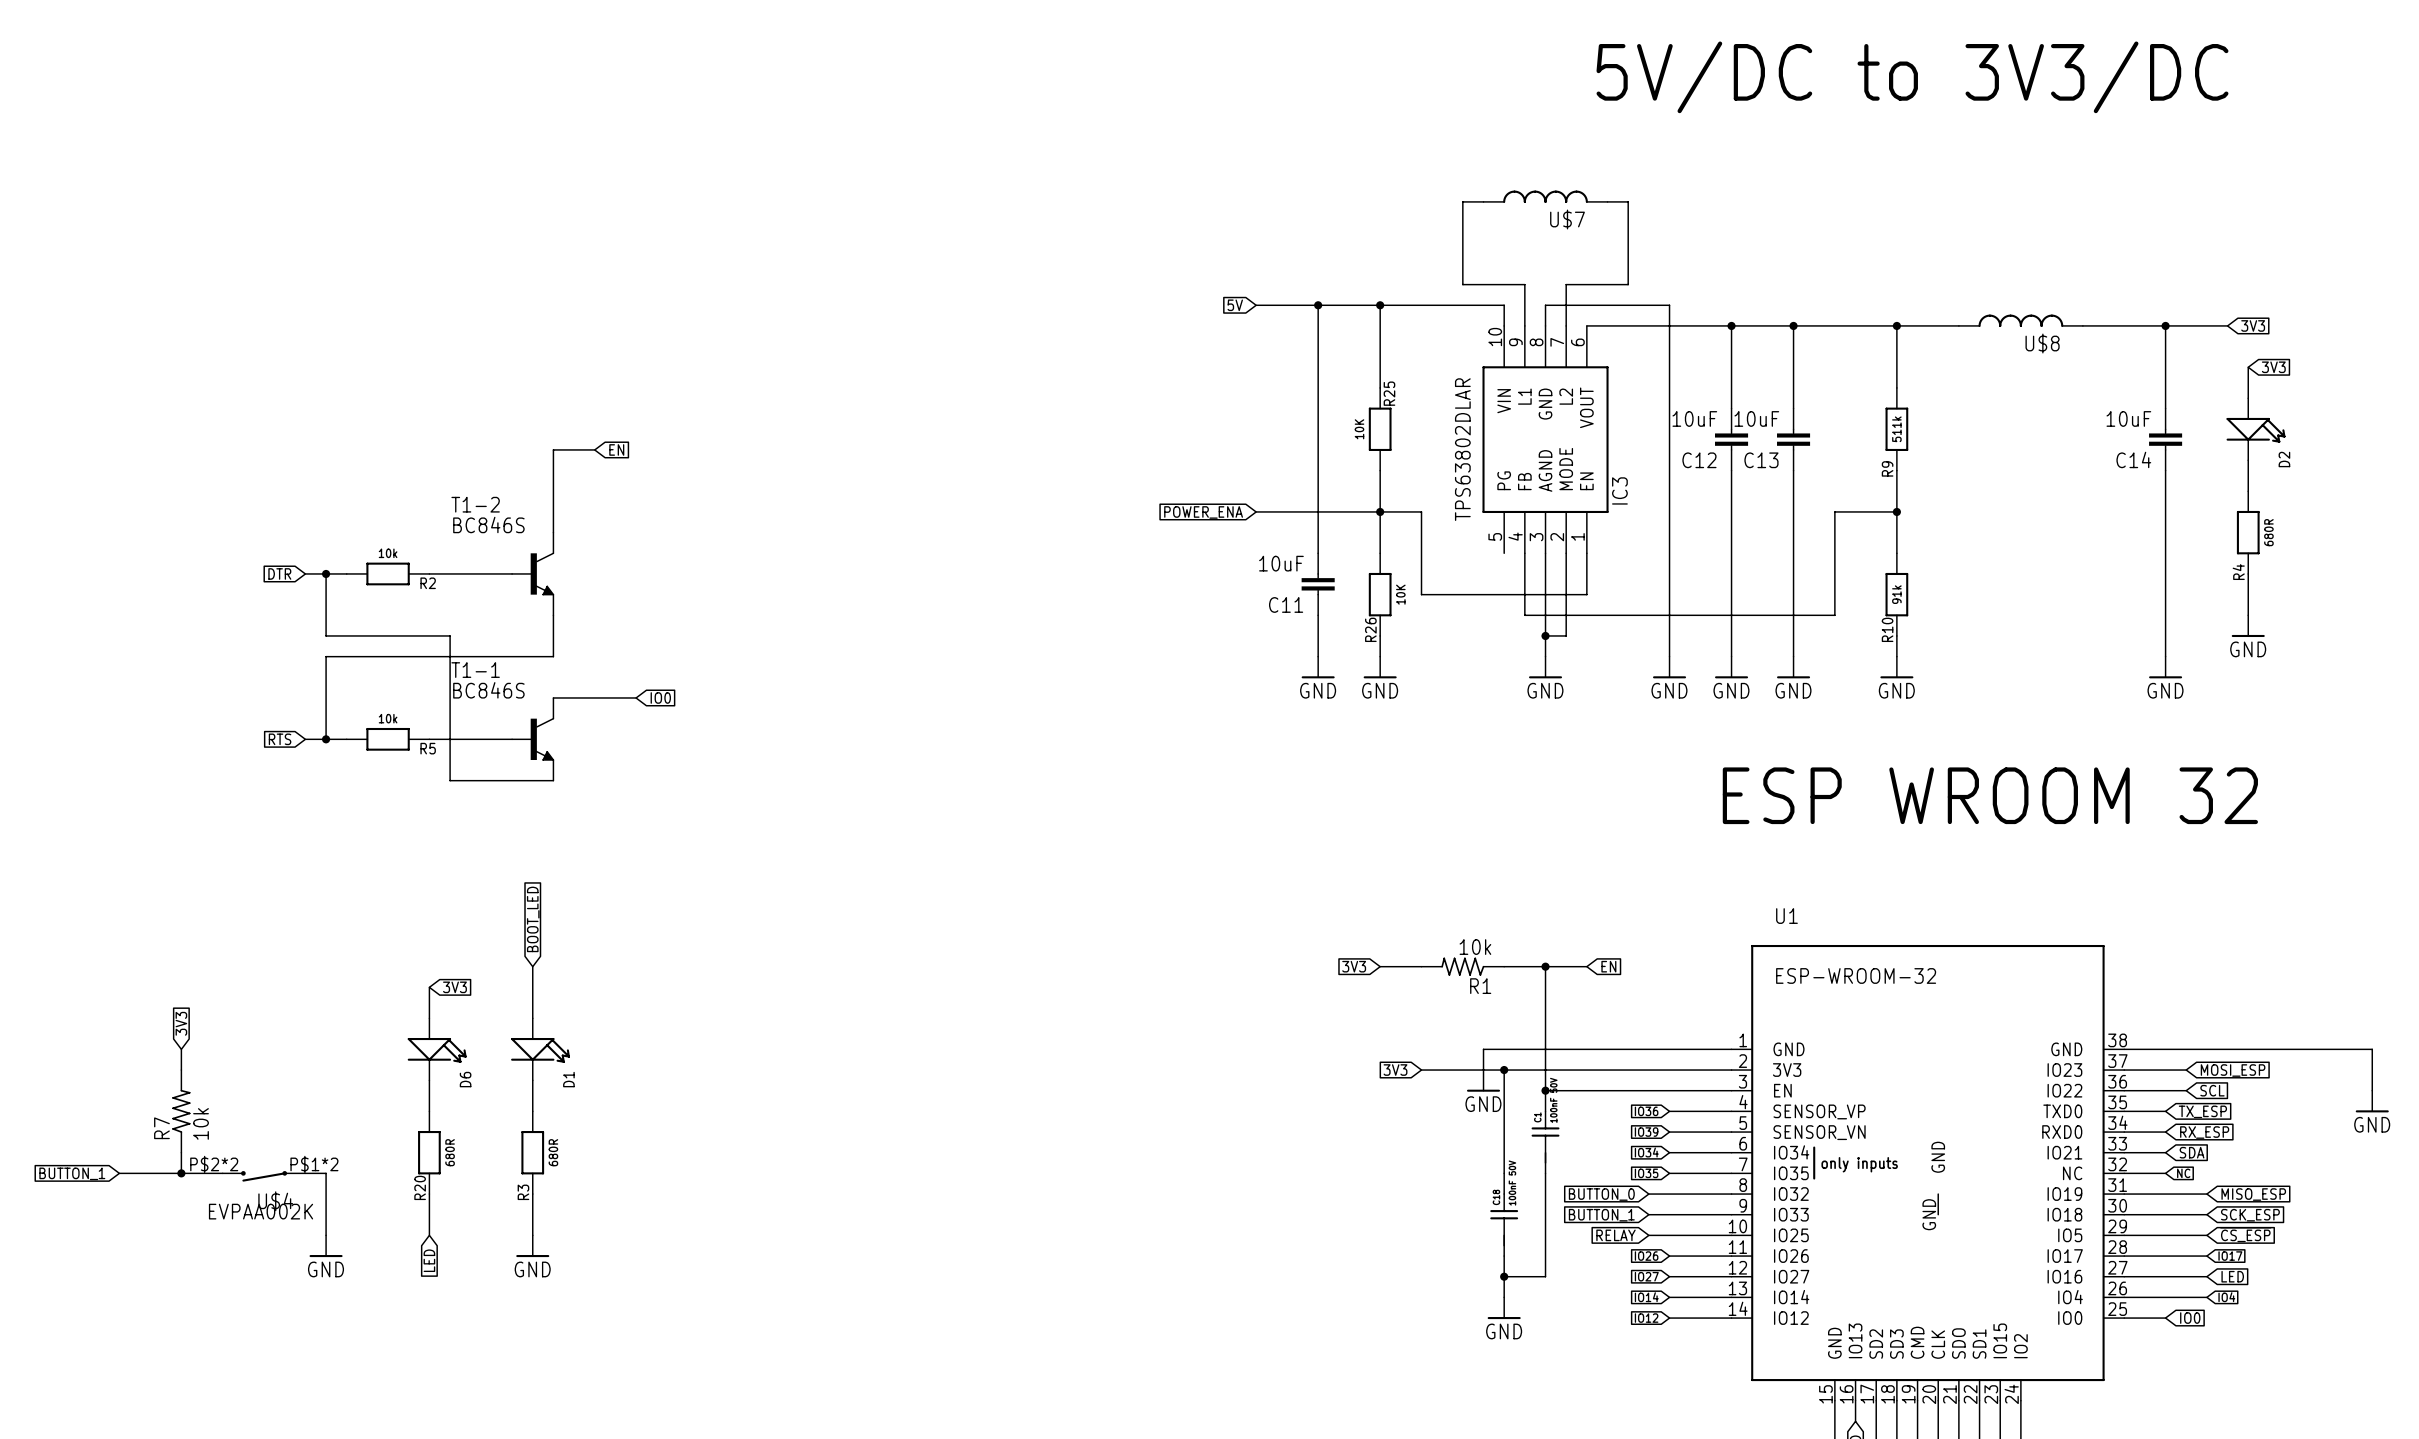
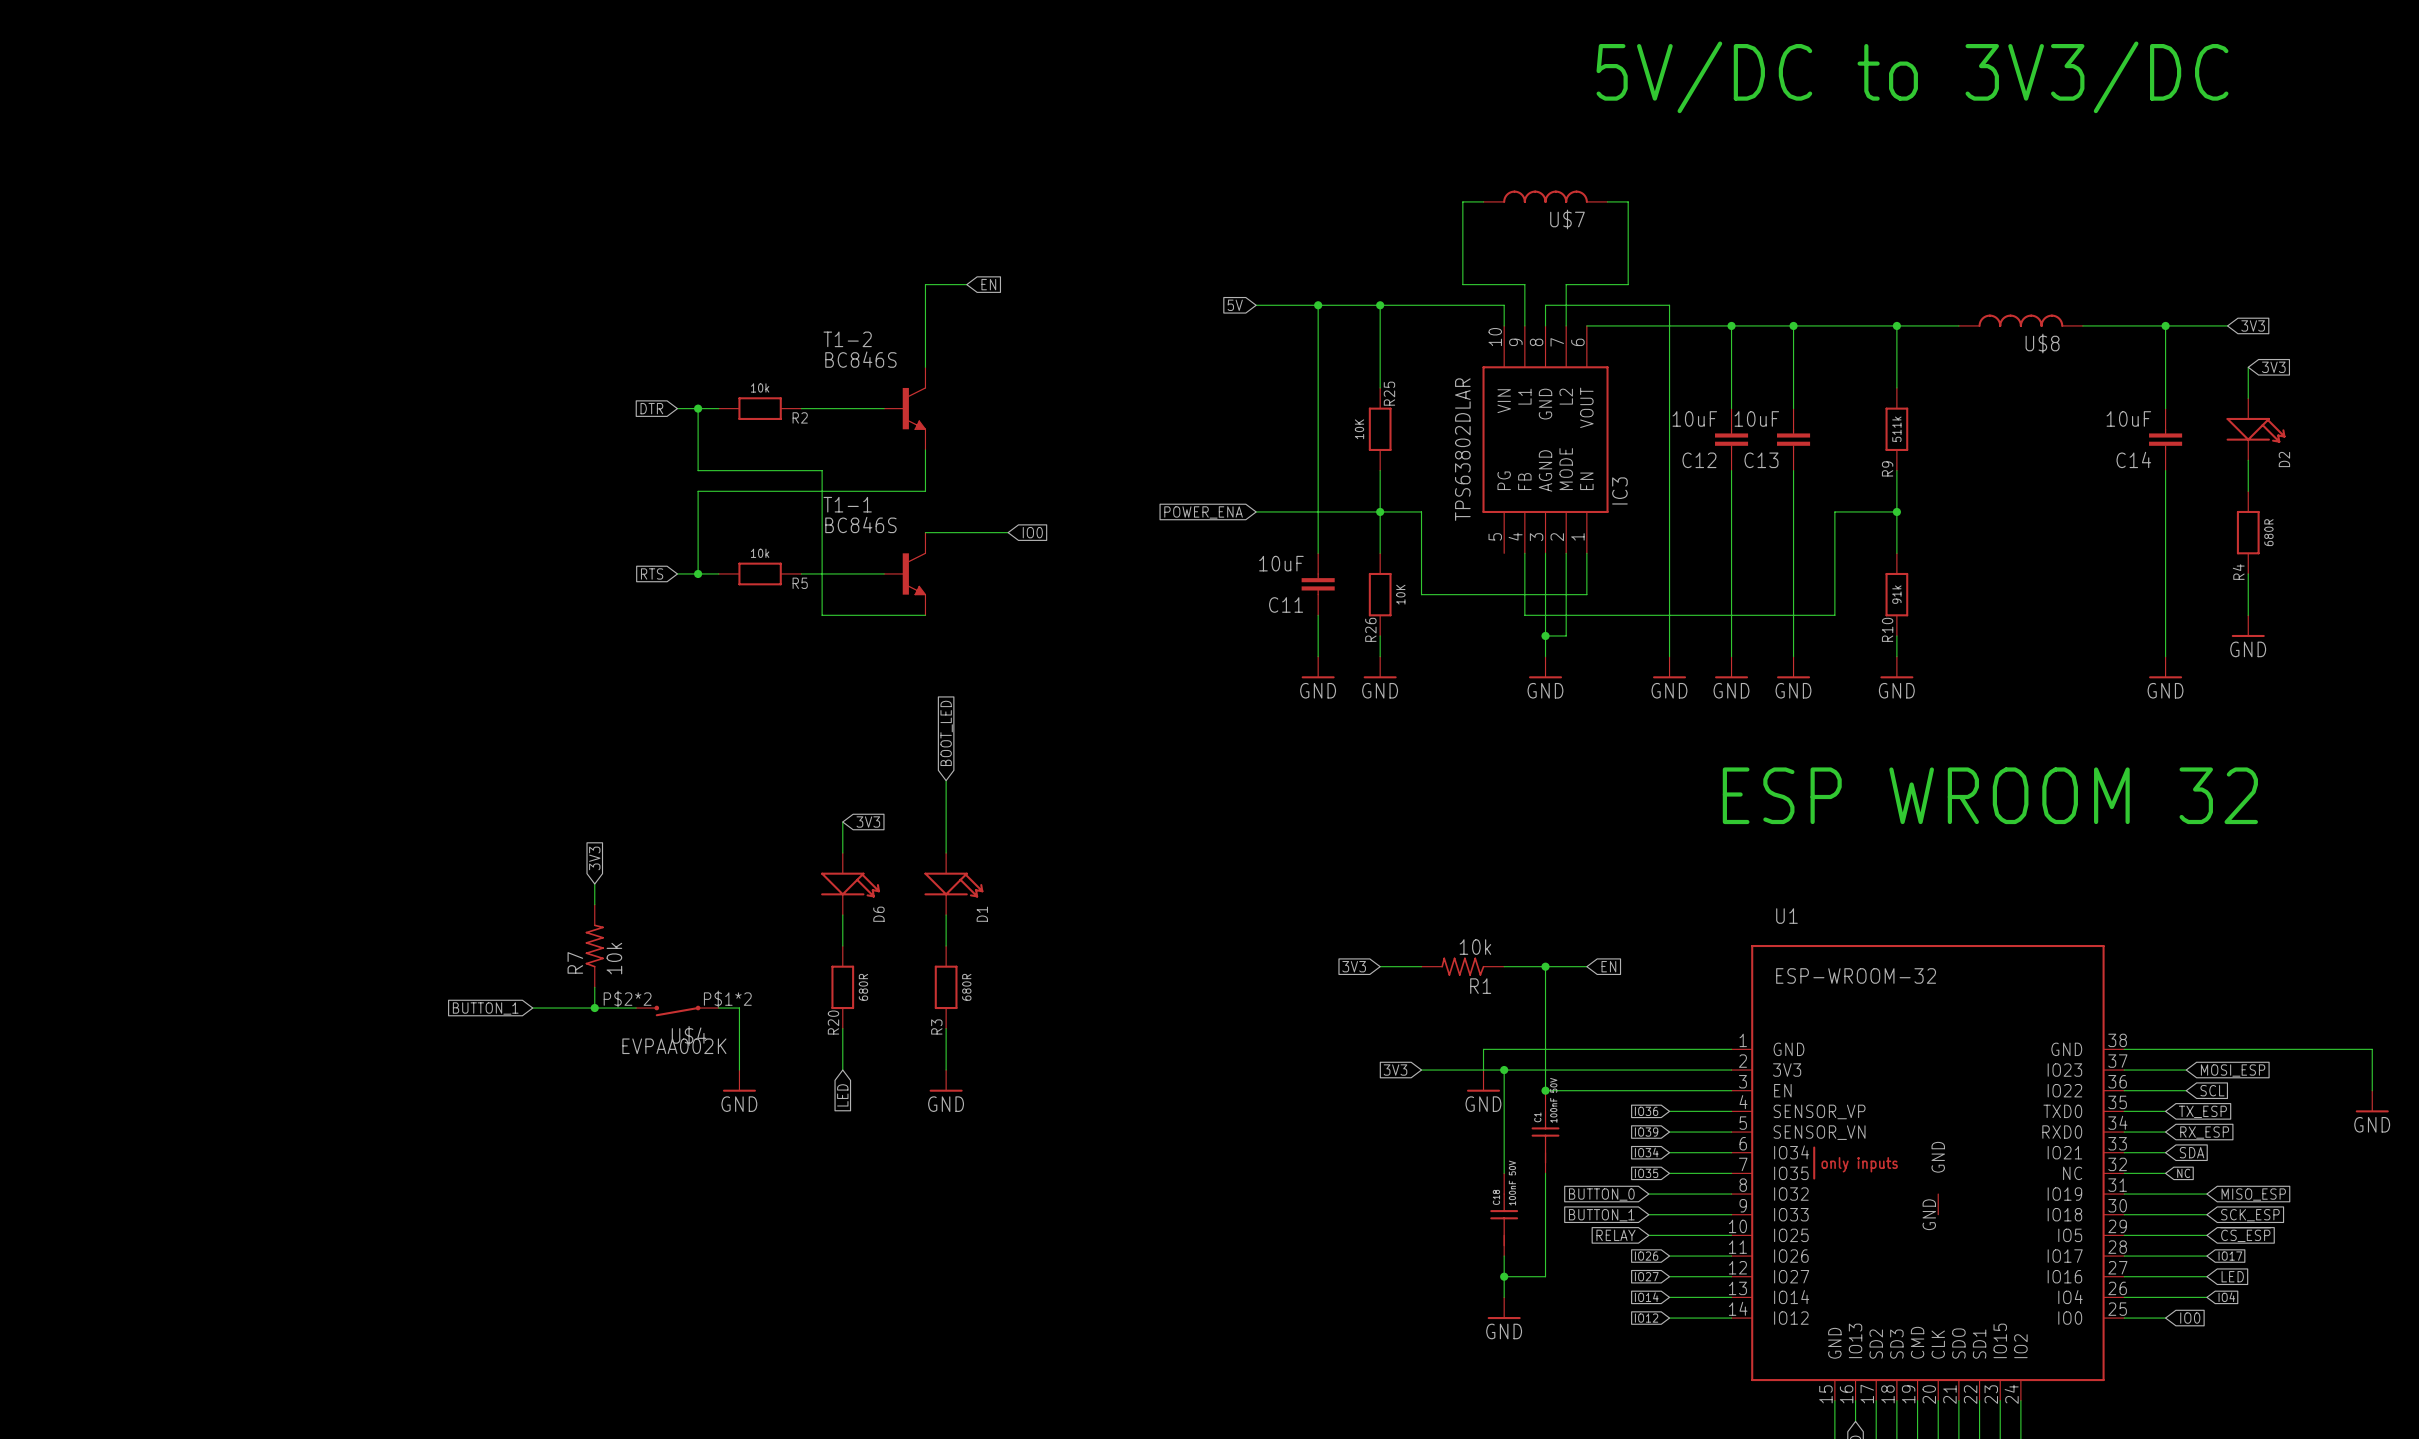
wire: none -> (966, 284) (925, 284) (925, 367)
global label: none -> EN (988, 284)
global label: none -> DTR (651, 408)
wire: none -> (677, 408) (718, 408)
wire: none -> (698, 408) (698, 470) (822, 470) (822, 615) (925, 615)
junction: none -> (698, 408)
wire: none -> (801, 408) (884, 408)
wire: (594, 449) (553, 449) (553, 532) -> none
global label: EN (616, 449) -> none
wire: none -> (925, 449) (925, 491) (698, 491) (698, 573)
wire: none -> (925, 532) (1008, 532)
global label: none -> IO0 (1032, 532)
global label: DTR (279, 573) -> none
wire: (305, 573) (346, 573) -> none
wire: (326, 573) (326, 635) (450, 635) (450, 780) (553, 780) -> none
junction: (326, 573) -> none
R2 position: (388, 573) -> (760, 408)
wire: (429, 573) (512, 573) -> none
T1-2 position: (533, 573) -> (905, 408)
global label: none -> RTS (652, 573)
wire: none -> (677, 573) (718, 573)
junction: none -> (698, 573)
wire: none -> (801, 573) (884, 573)
wire: (553, 615) (553, 656) (326, 656) (326, 739) -> none
wire: (553, 697) (636, 697) -> none
global label: IO0 (660, 697) -> none
global label: none -> BOOT_LED (946, 733)
global label: RTS (280, 739) -> none
wire: (305, 739) (346, 739) -> none
junction: (326, 739) -> none
R5 position: (388, 739) -> (760, 573)
wire: (429, 739) (512, 739) -> none
T1-1 position: (533, 739) -> (905, 573)
wire: none -> (946, 780) (946, 853)
wire: none -> (842, 822) (842, 853)
global label: none -> 3V3 (868, 822)
wire: none -> (594, 884) (594, 904)
wire: none -> (842, 915) (842, 946)
wire: none -> (946, 915) (946, 946)
global label: BOOT_LED (533, 919) -> none
wire: (532, 966) (532, 1018) -> none
wire: (429, 987) (429, 1018) -> none
global label rotation: 0° (454, 987) -> 90° counterclockwise (594, 858)
global label position: 3V3 (454, 987) -> 3V3 (594, 858)
wire: none -> (594, 987) (594, 1008)
global label: none -> BUTTON_1 (485, 1008)
wire: none -> (532, 1008) (636, 1008)
junction: none -> (594, 1008)
wire: none -> (718, 1008) (739, 1008) (739, 1070)
global label: 3V3 (181, 1023) -> none
wire: none -> (842, 1028) (842, 1070)
wire: none -> (946, 1028) (946, 1070)
wire: (181, 1049) (181, 1070) -> none
D6 position: (437, 1049) -> (850, 884)
D1 position: (540, 1049) -> (953, 884)
wire: (429, 1080) (429, 1111) -> none
wire: (532, 1080) (532, 1111) -> none
power symbol: none -> GND (739, 1080)
power symbol: none -> GND (946, 1080)
global label: none -> LED (842, 1095)
R7 position: (181, 1111) -> (594, 946)
wire: (181, 1152) (181, 1173) -> none
R20 position: (429, 1152) -> (842, 987)
R3 position: (532, 1152) -> (946, 987)
global label: BUTTON_1 (72, 1173) -> none
wire: (119, 1173) (222, 1173) -> none
junction: (181, 1173) -> none
wire: (305, 1173) (326, 1173) (326, 1235) -> none
U$4 position: (264, 1176) -> (677, 1011)
wire: (429, 1194) (429, 1235) -> none
wire: (532, 1194) (532, 1235) -> none
power symbol: GND (326, 1246) -> none
power symbol: GND (532, 1246) -> none
global label: LED (429, 1260) -> none

